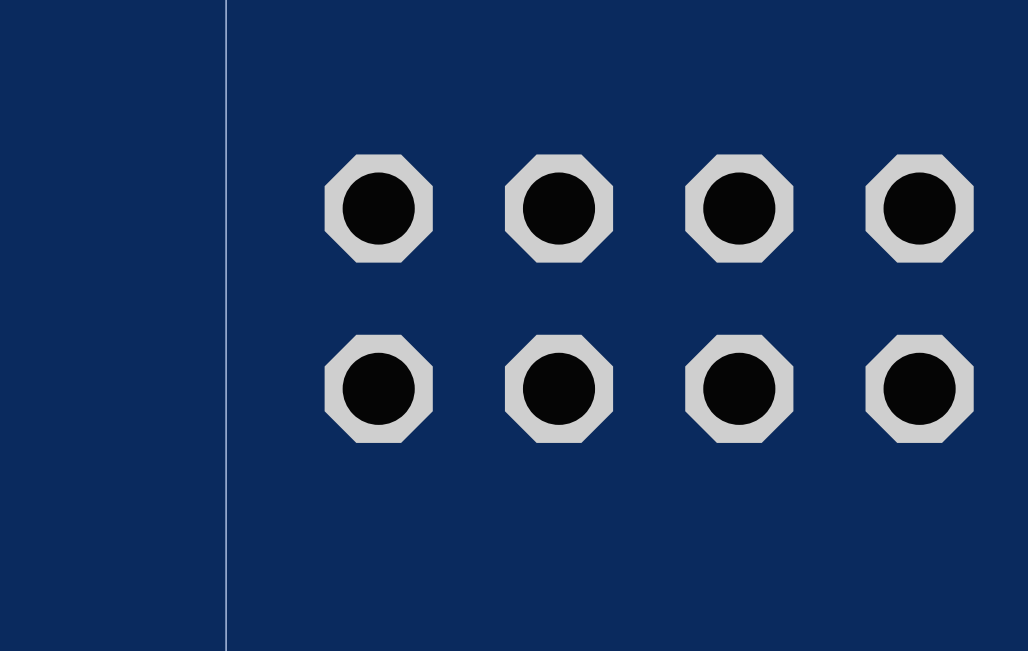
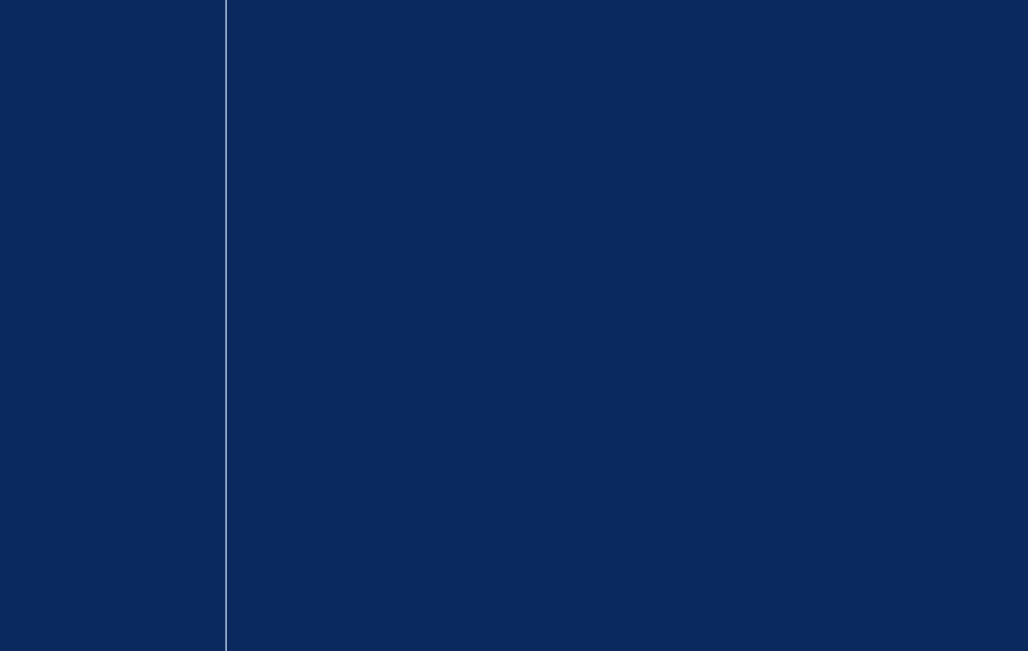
part: (649, 298) -> none

